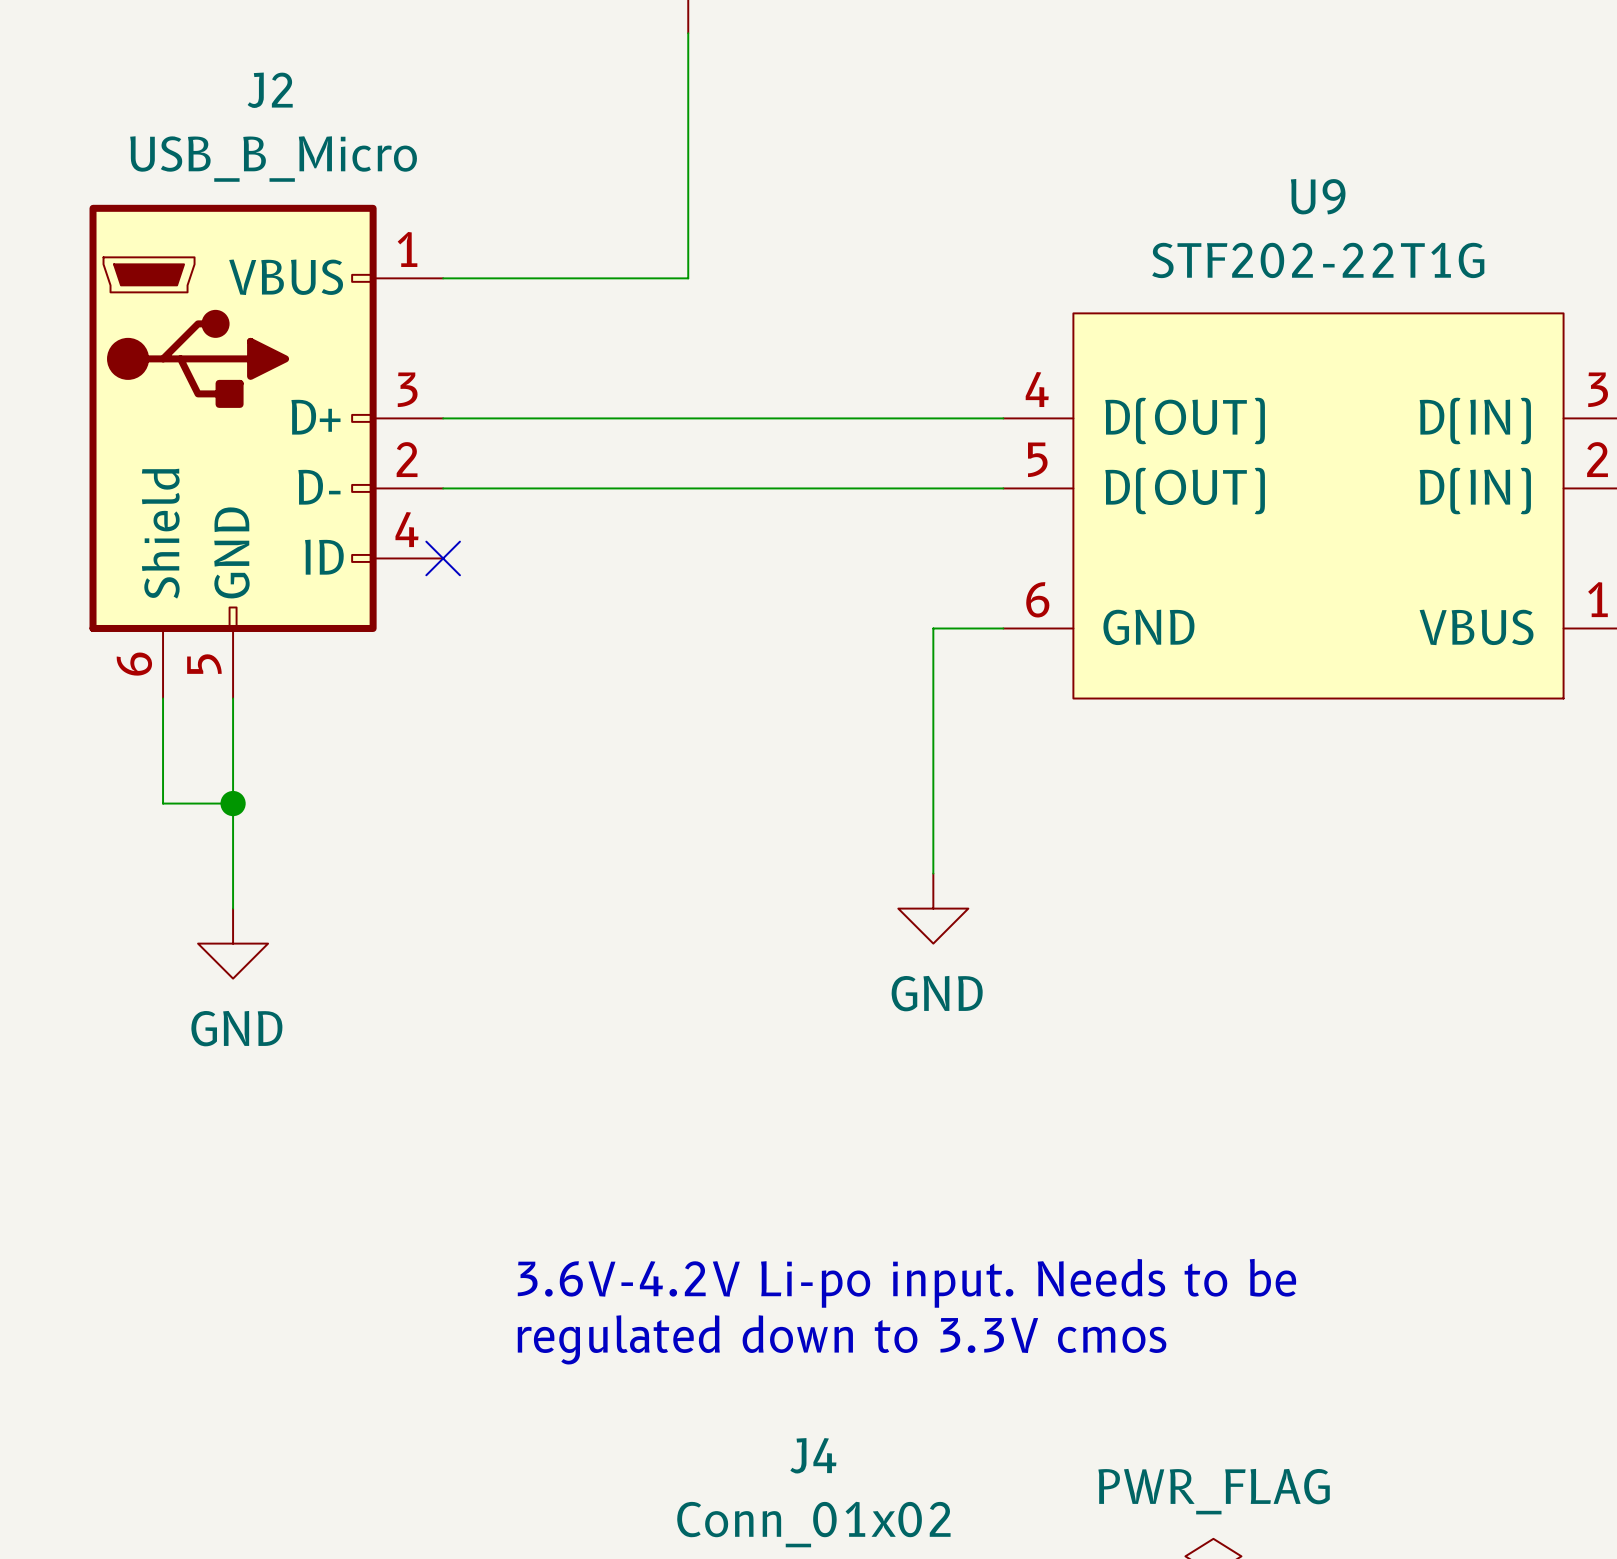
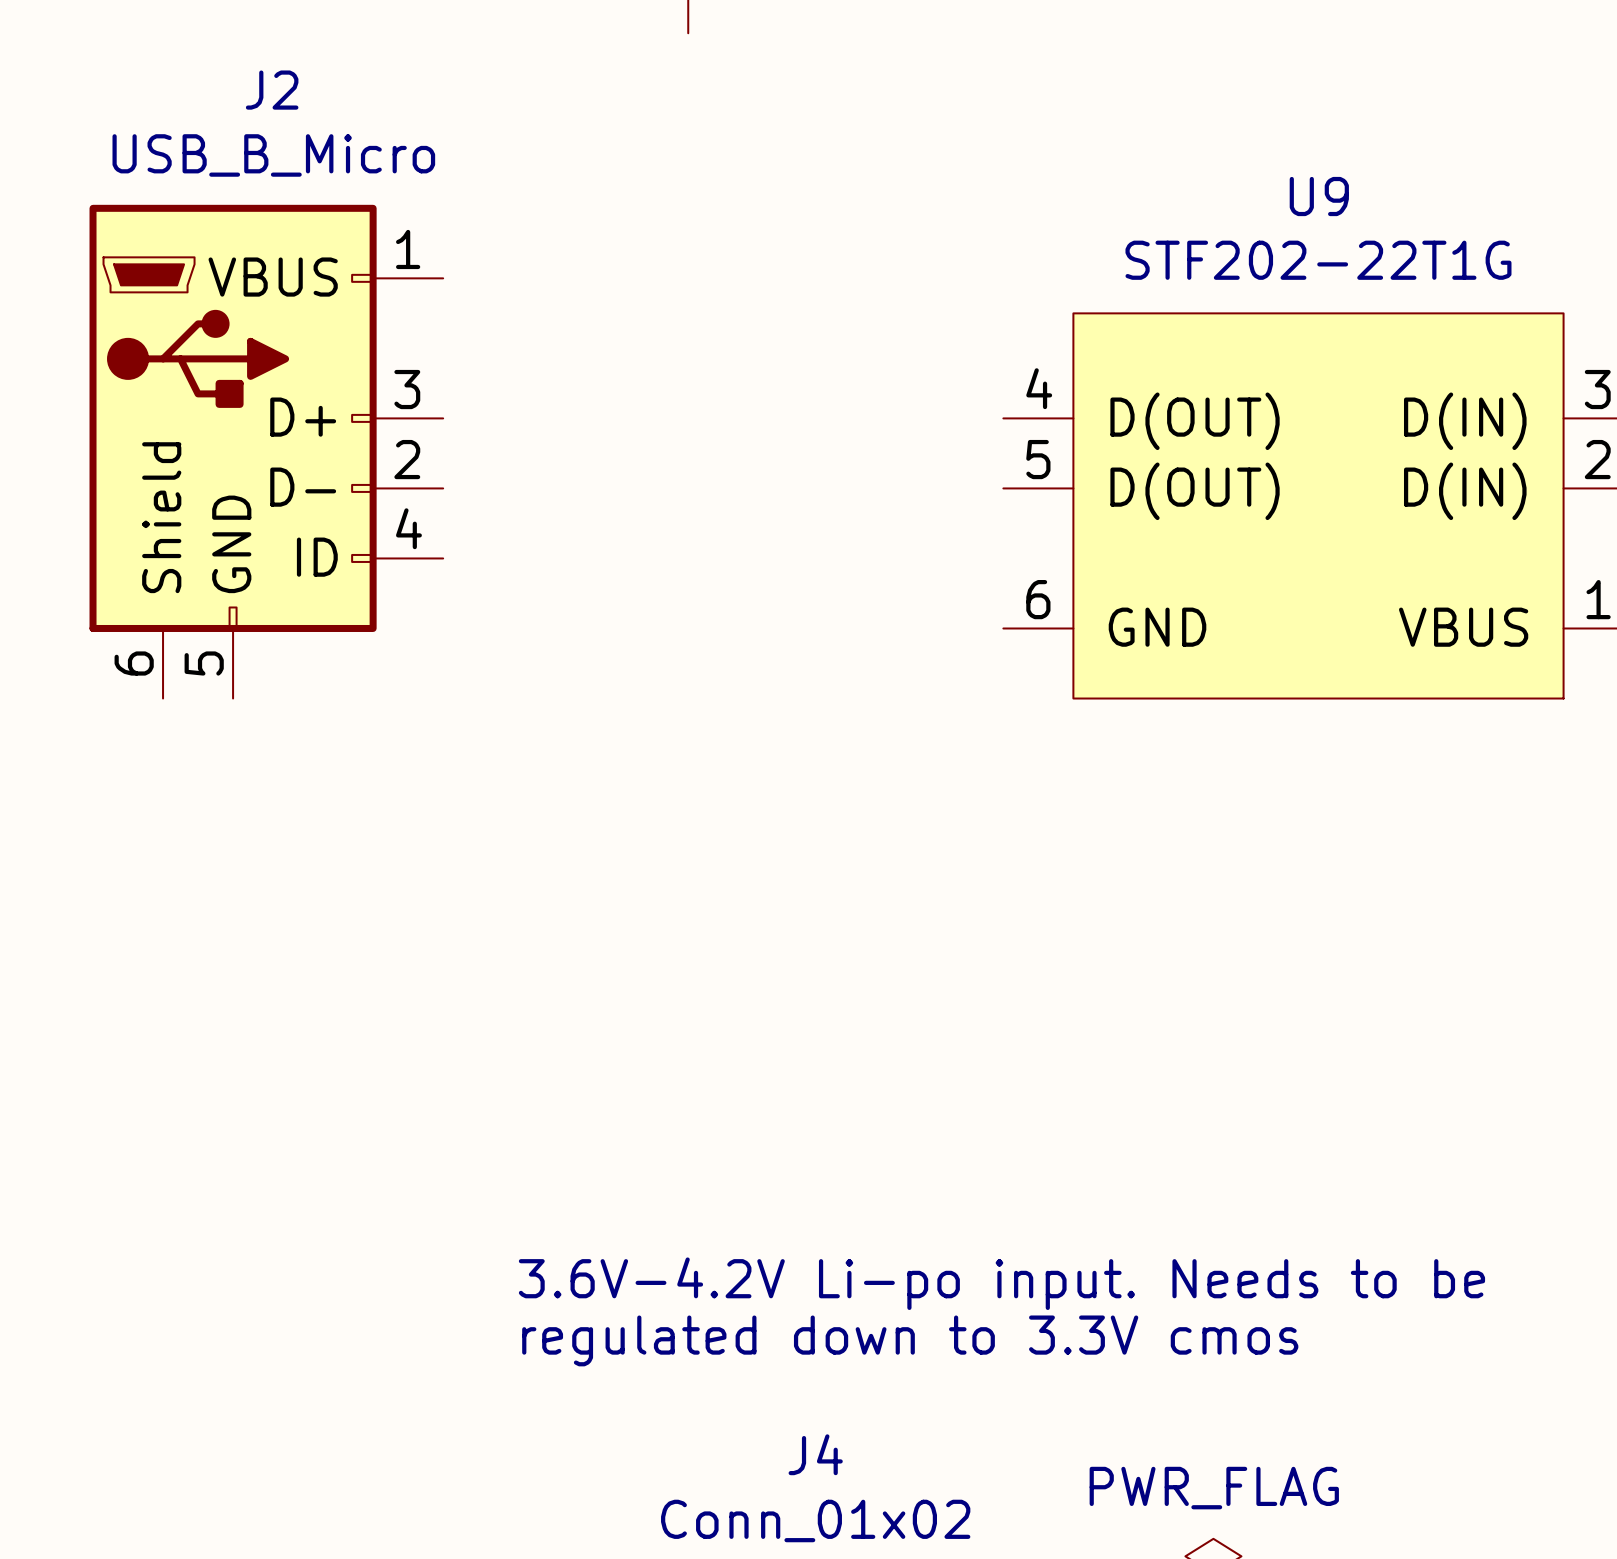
wire: (688, 33) (688, 278) (443, 278) -> none
wire: (443, 418) (1003, 418) -> none
wire: (443, 488) (1003, 488) -> none
no-connect mark: (443, 558) -> none
wire: (1003, 628) (933, 628) (933, 873) -> none
wire: (163, 698) (163, 803) (233, 803) -> none
wire: (233, 698) (233, 908) -> none
junction: (233, 803) -> none
power symbol: GND (933, 908) -> none
power symbol: GND (233, 943) -> none

